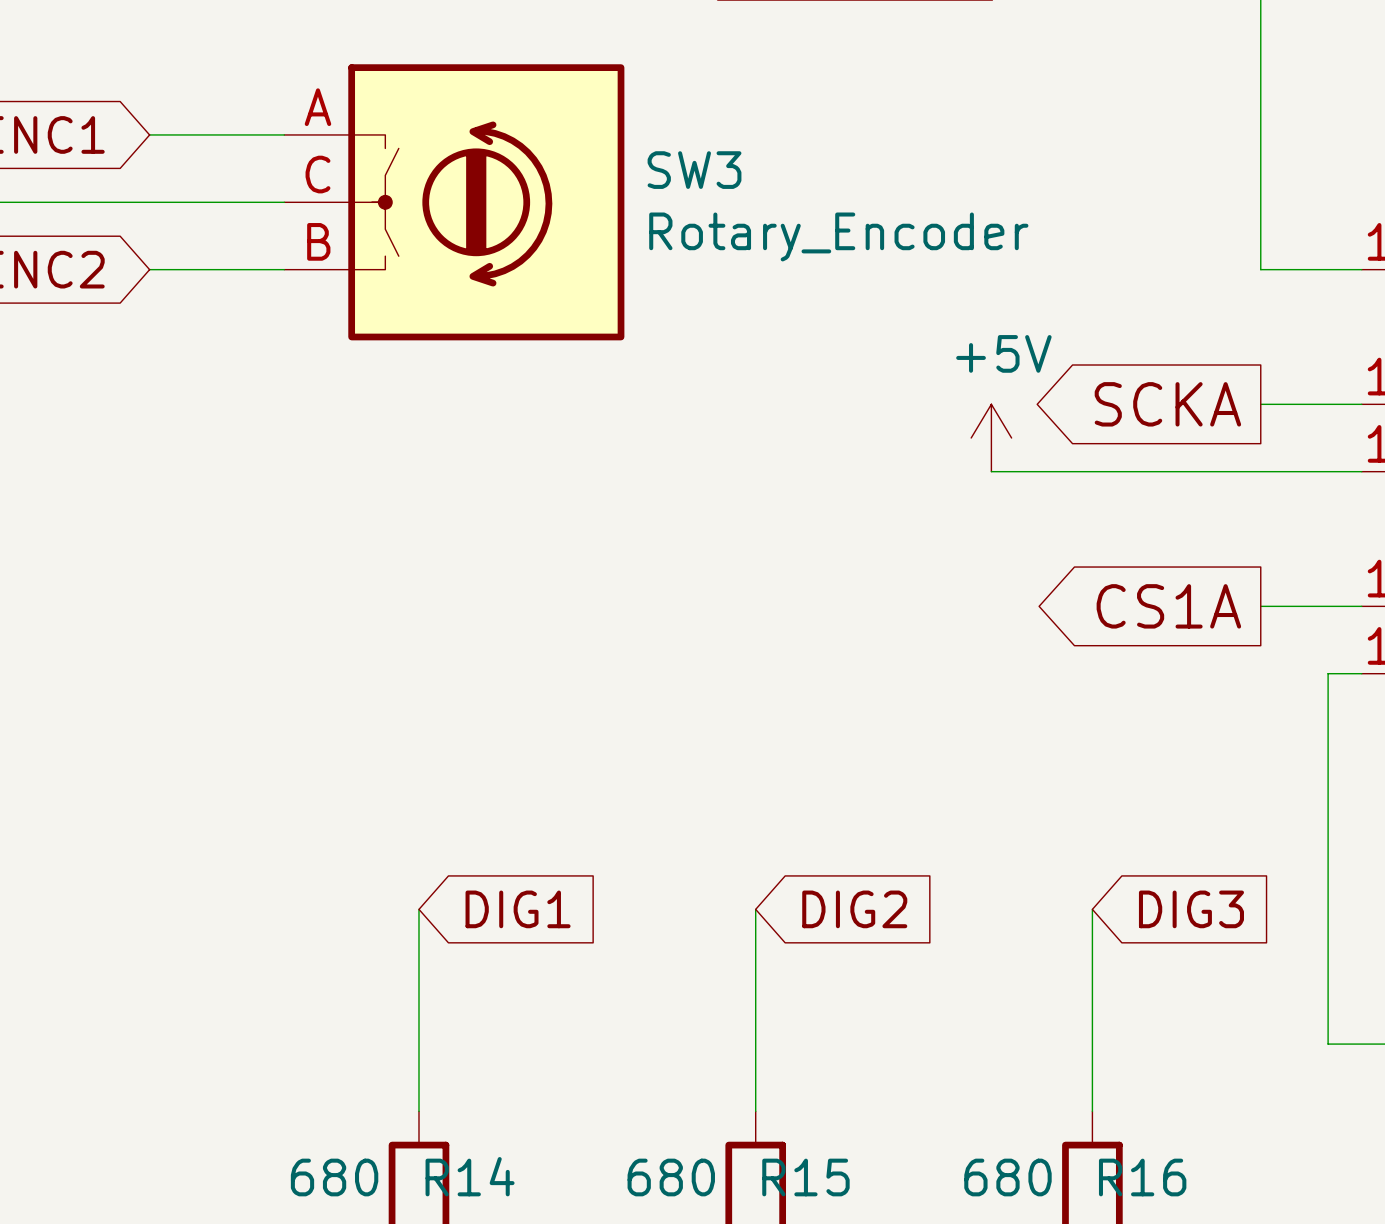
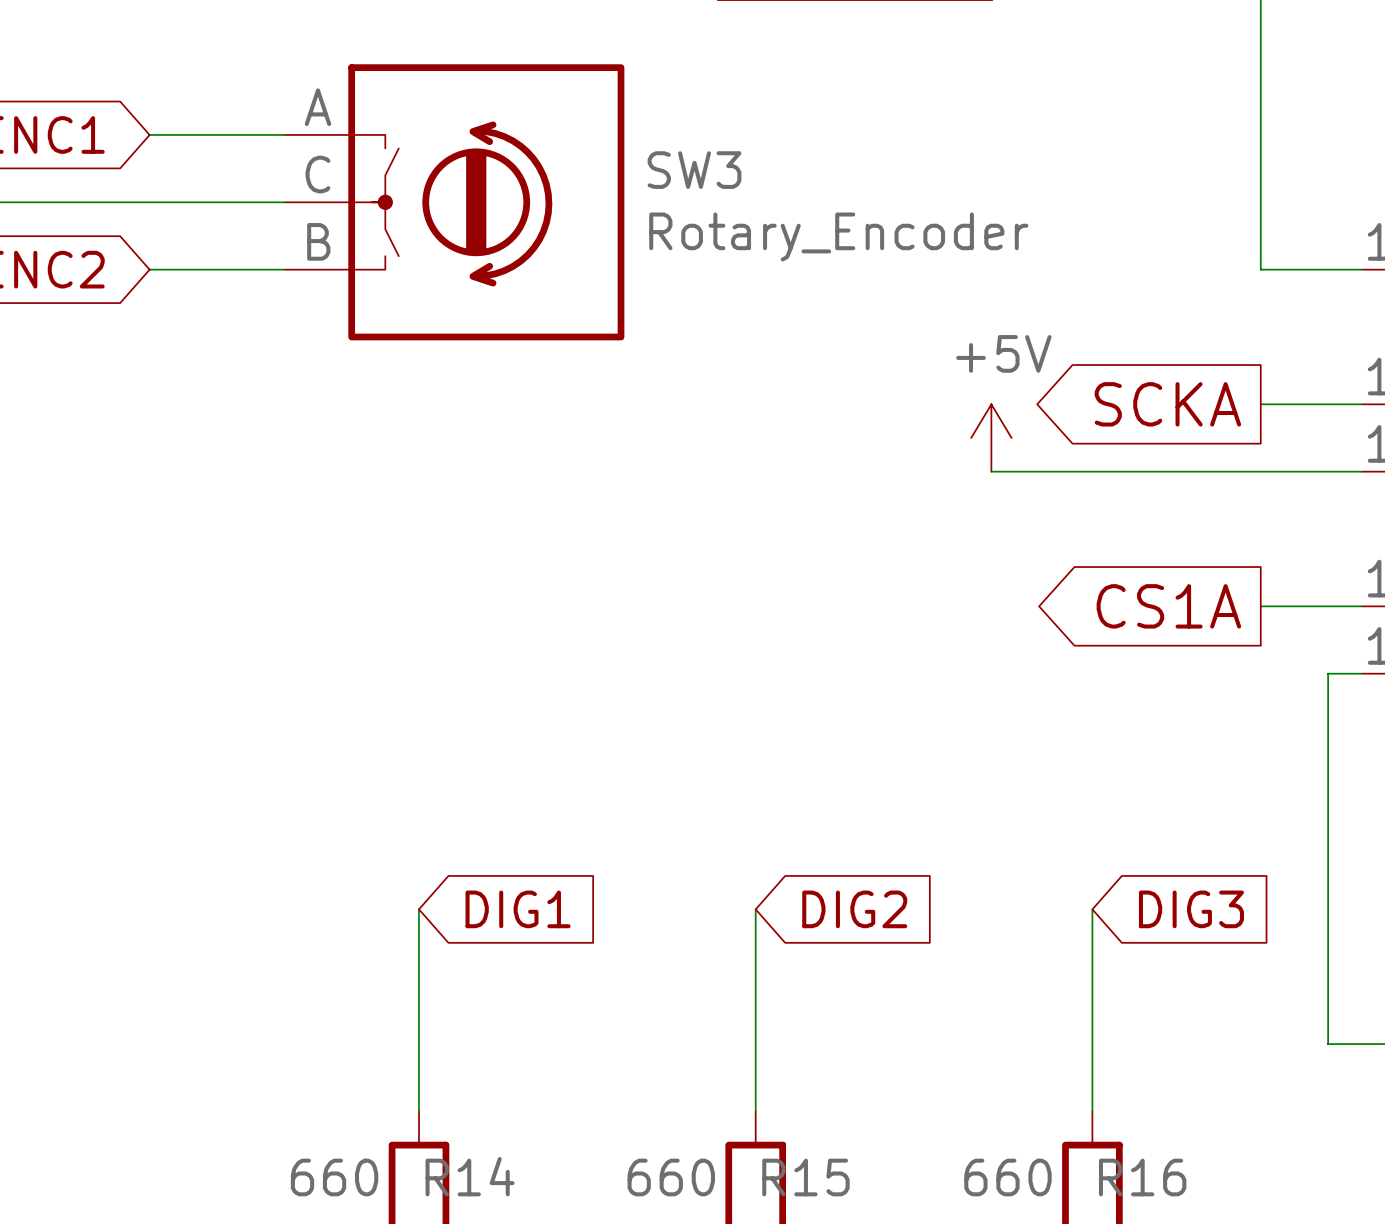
R14 value: 680 (334, 1177) -> 660 (334, 1177)
R15 value: 680 (671, 1177) -> 660 (671, 1177)
R16 value: 680 (1007, 1177) -> 660 (1007, 1177)

